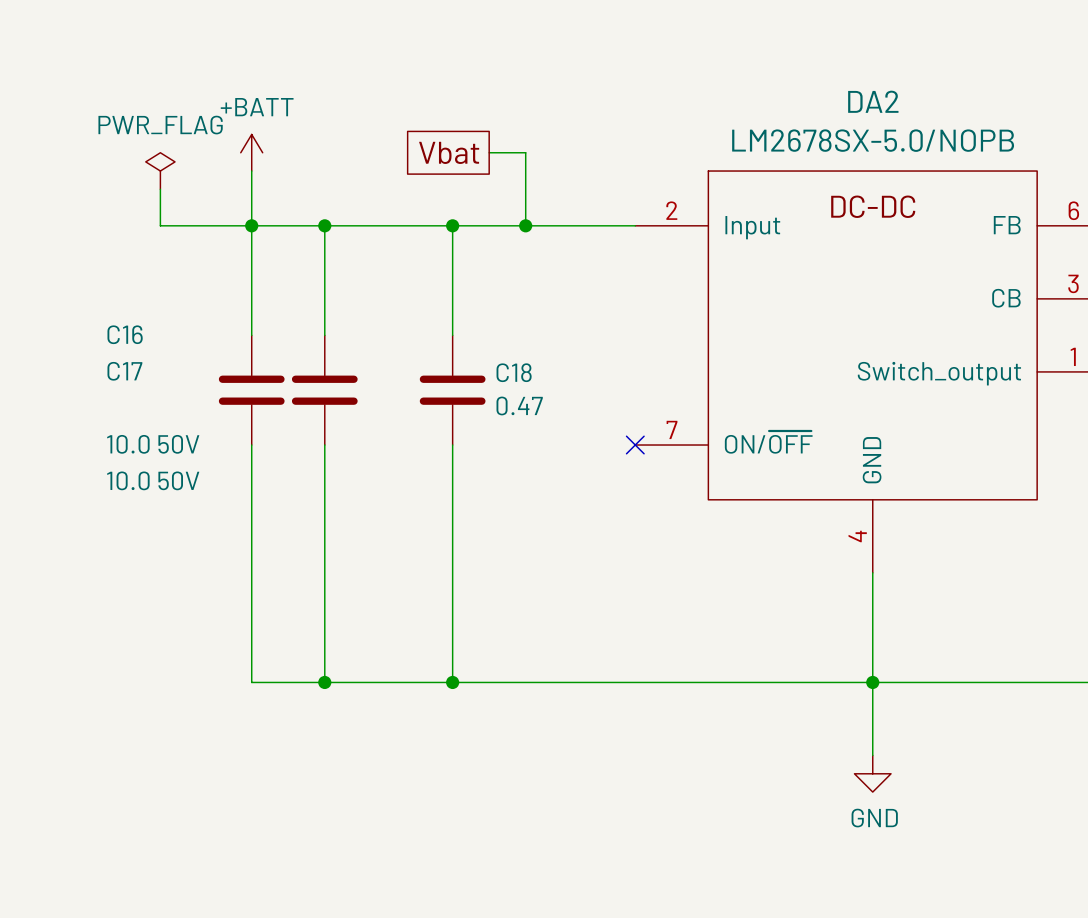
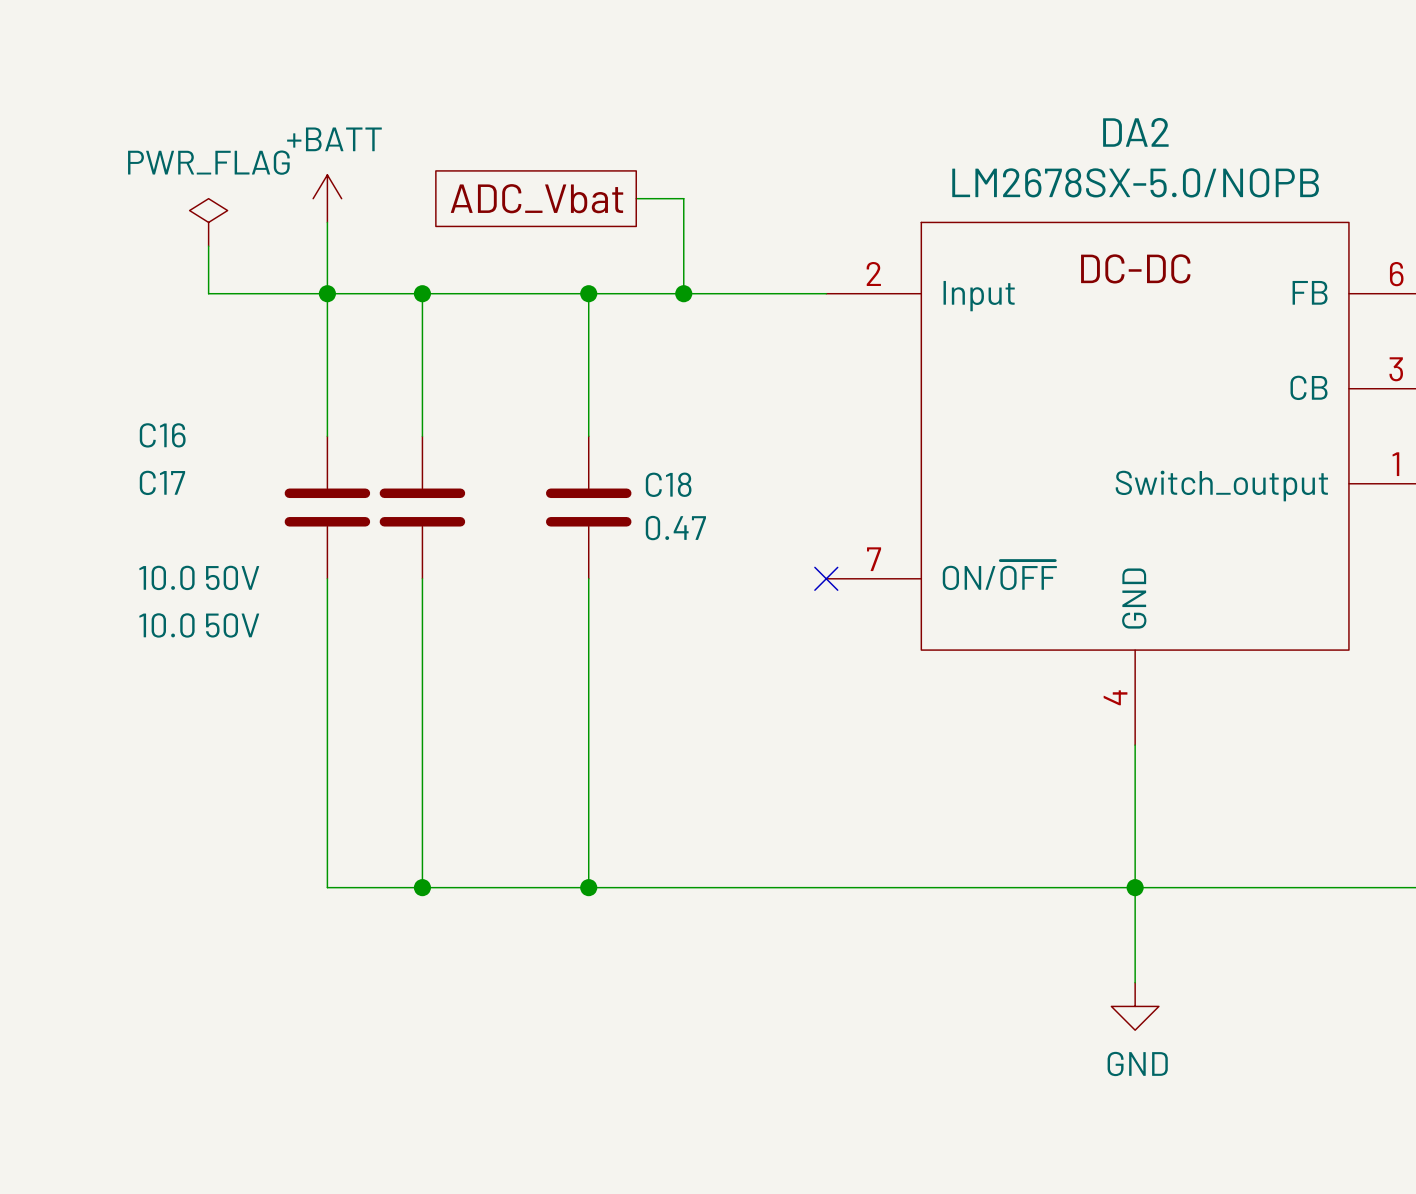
global label: Vbat (449, 152) -> ADC_Vbat (536, 198)

